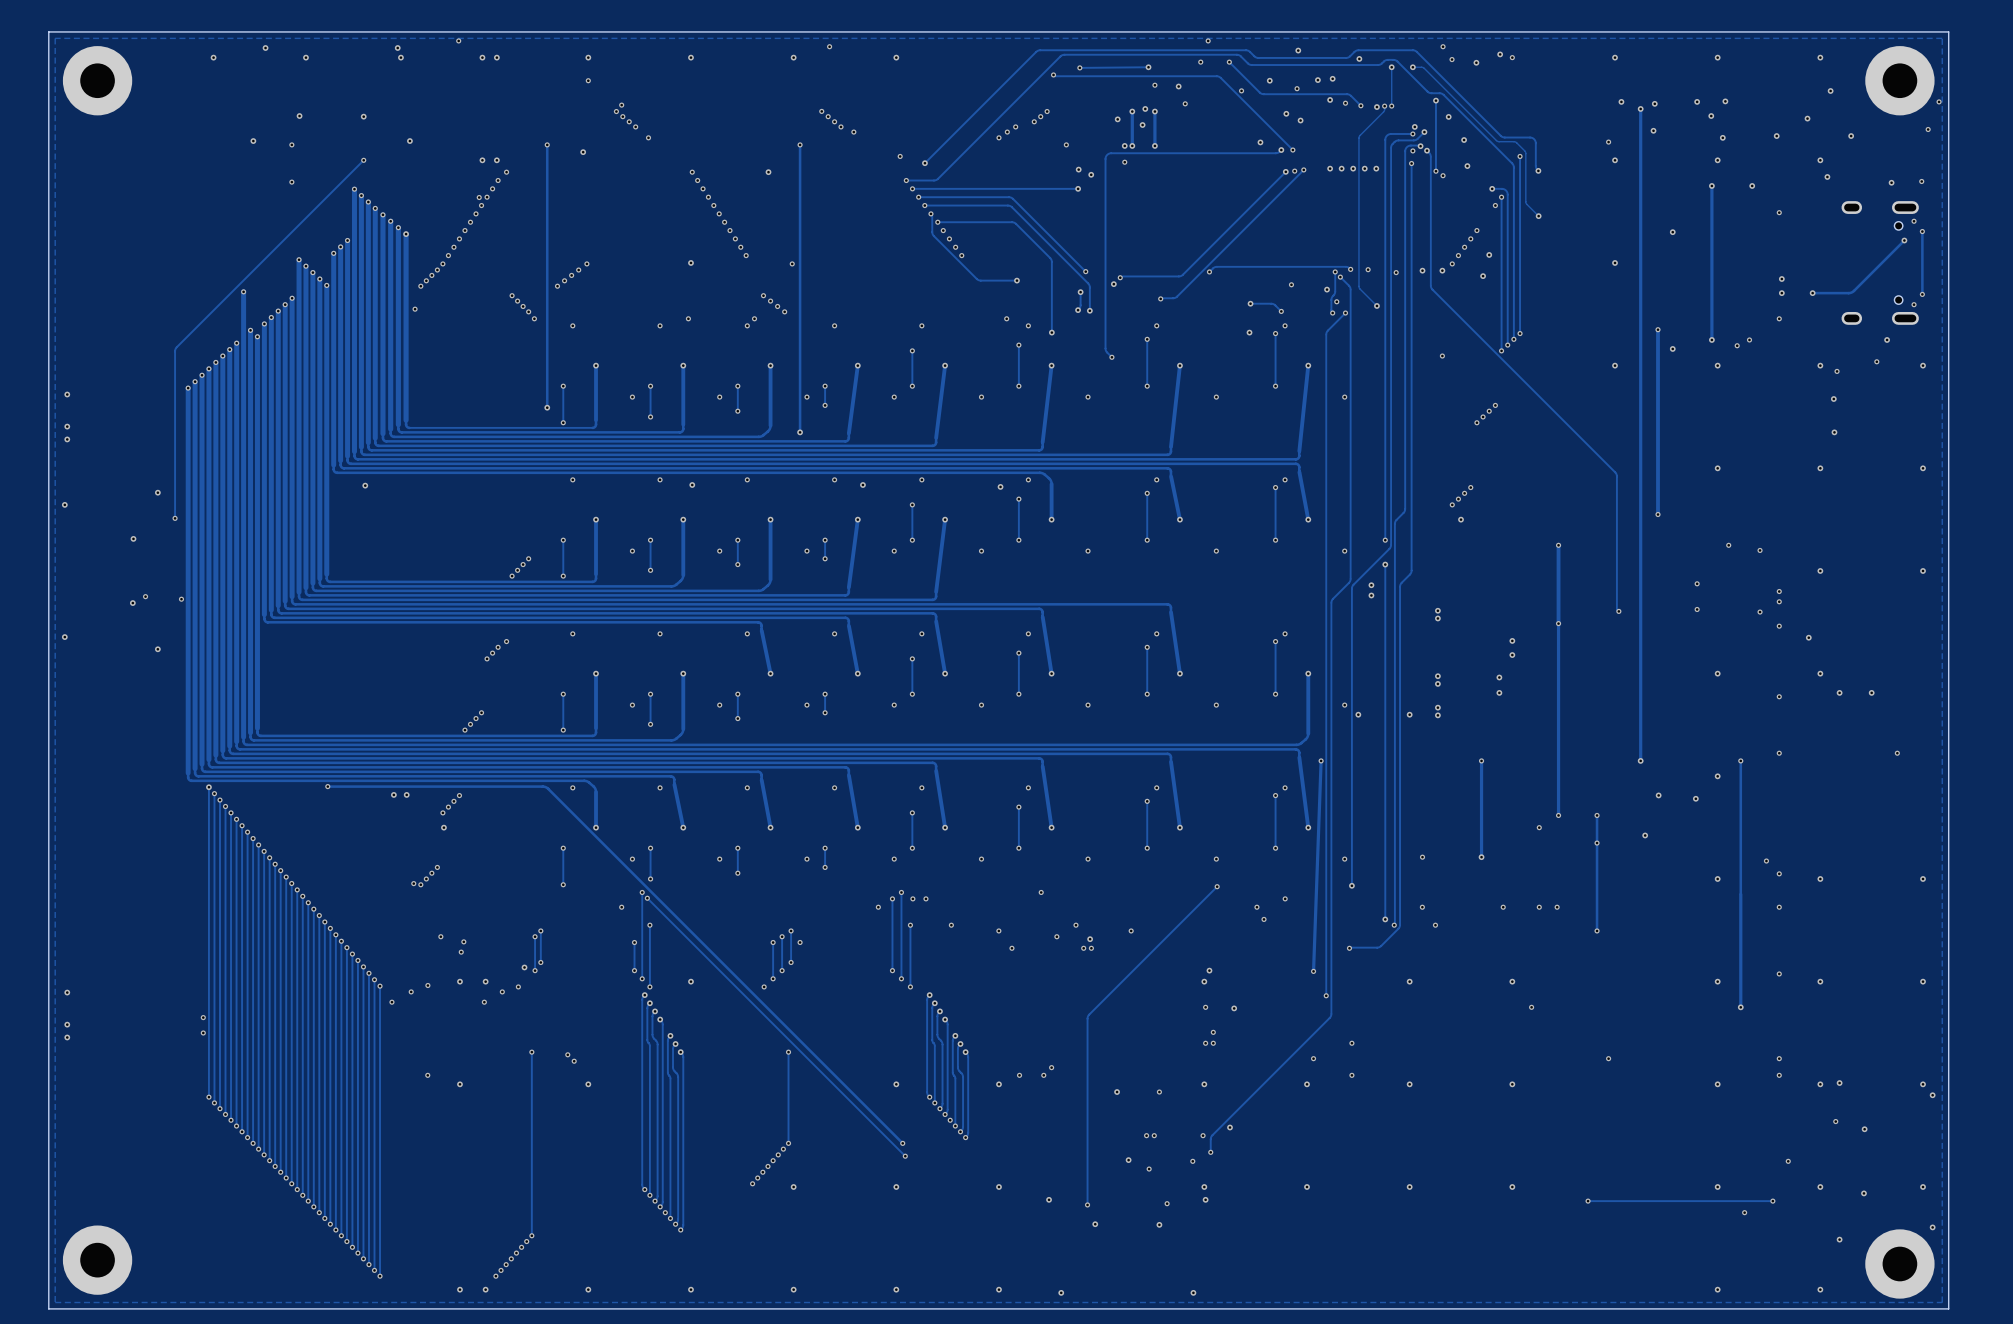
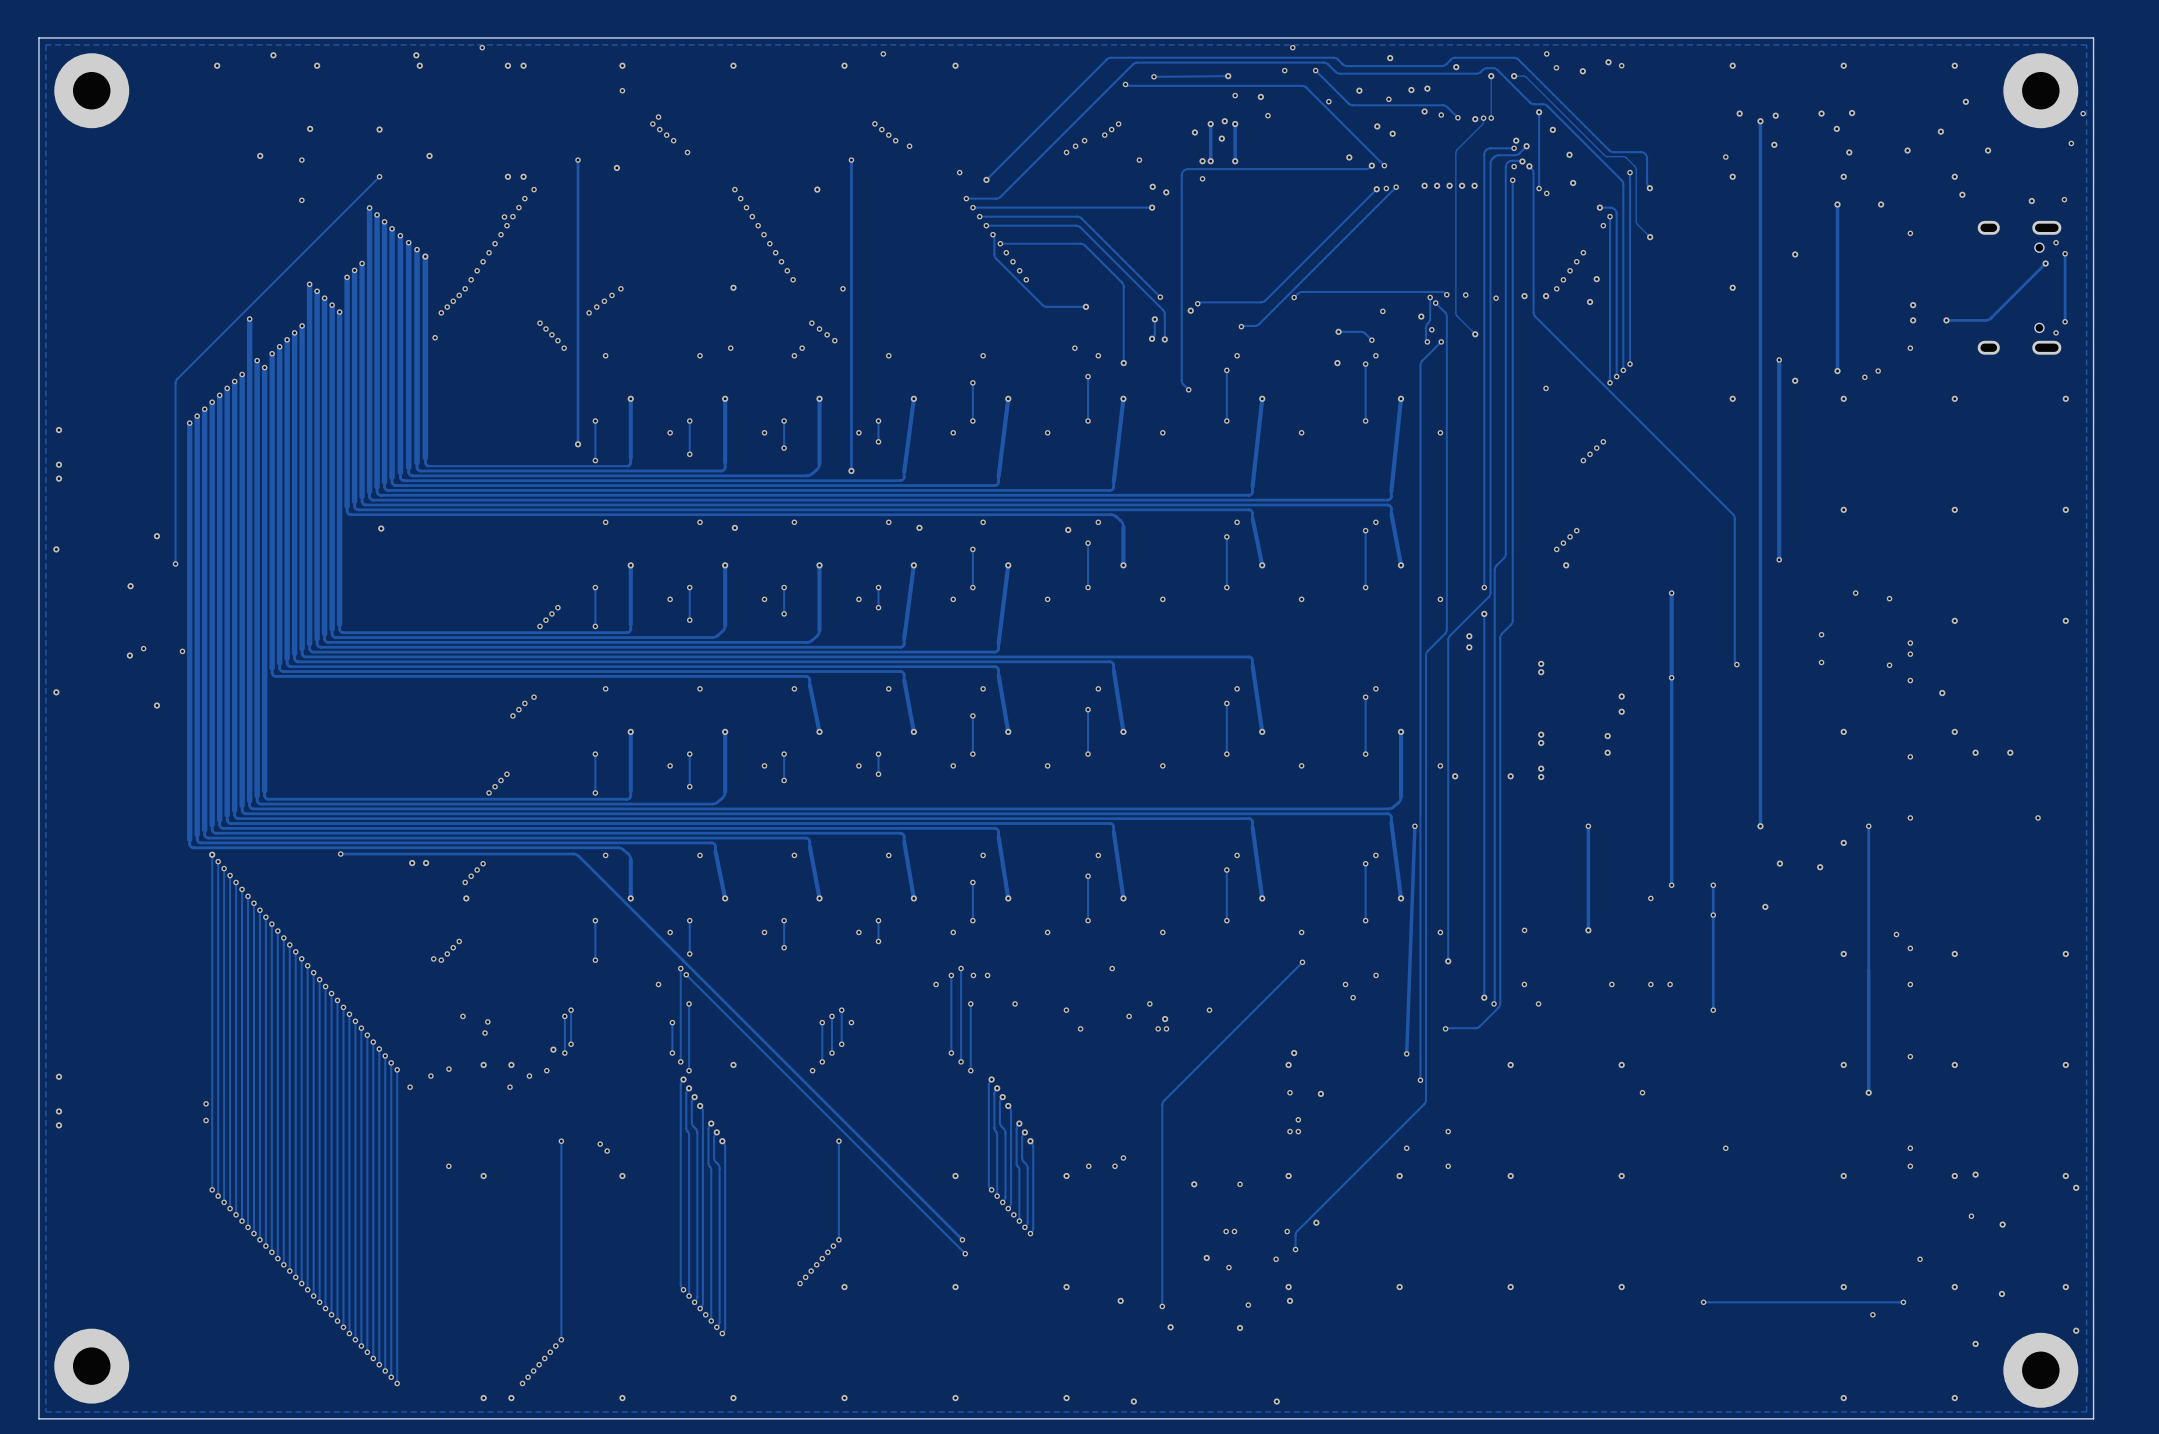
via: (1887, 339) -> none
via: (1876, 361) -> none
via: (1837, 371) -> none
via: (1833, 399) -> none
via: (1834, 432) -> none

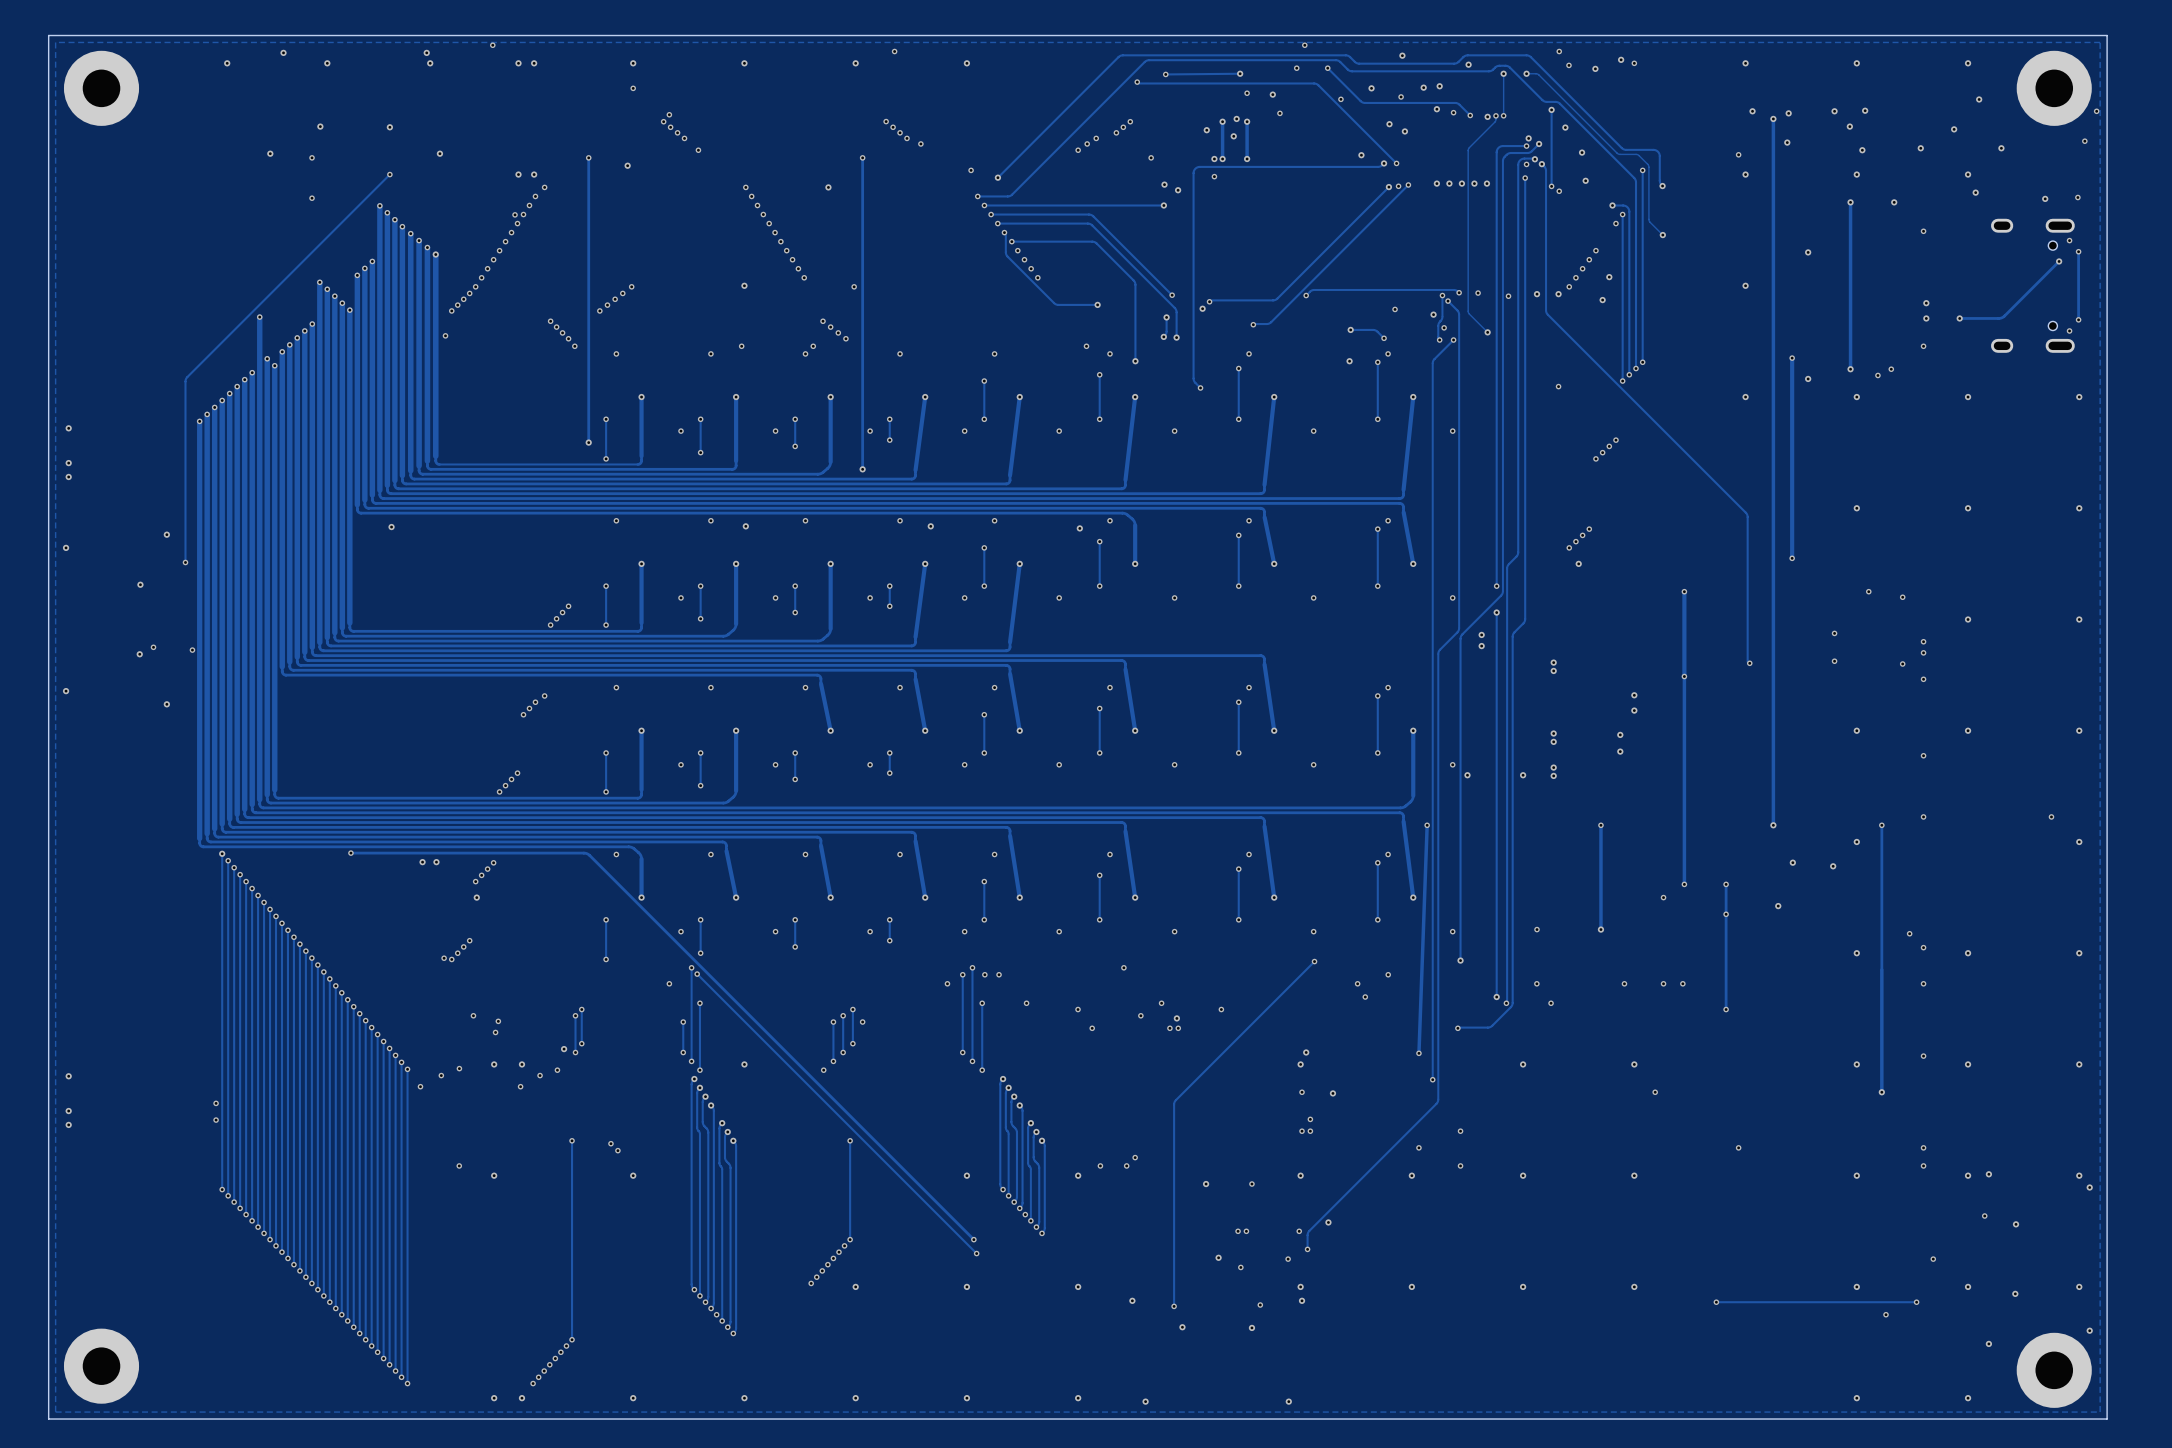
via: (1942, 693) -> none
via: none -> (2079, 730)
via: (1975, 752) -> none
via: (2010, 752) -> none
via: none -> (2079, 841)

